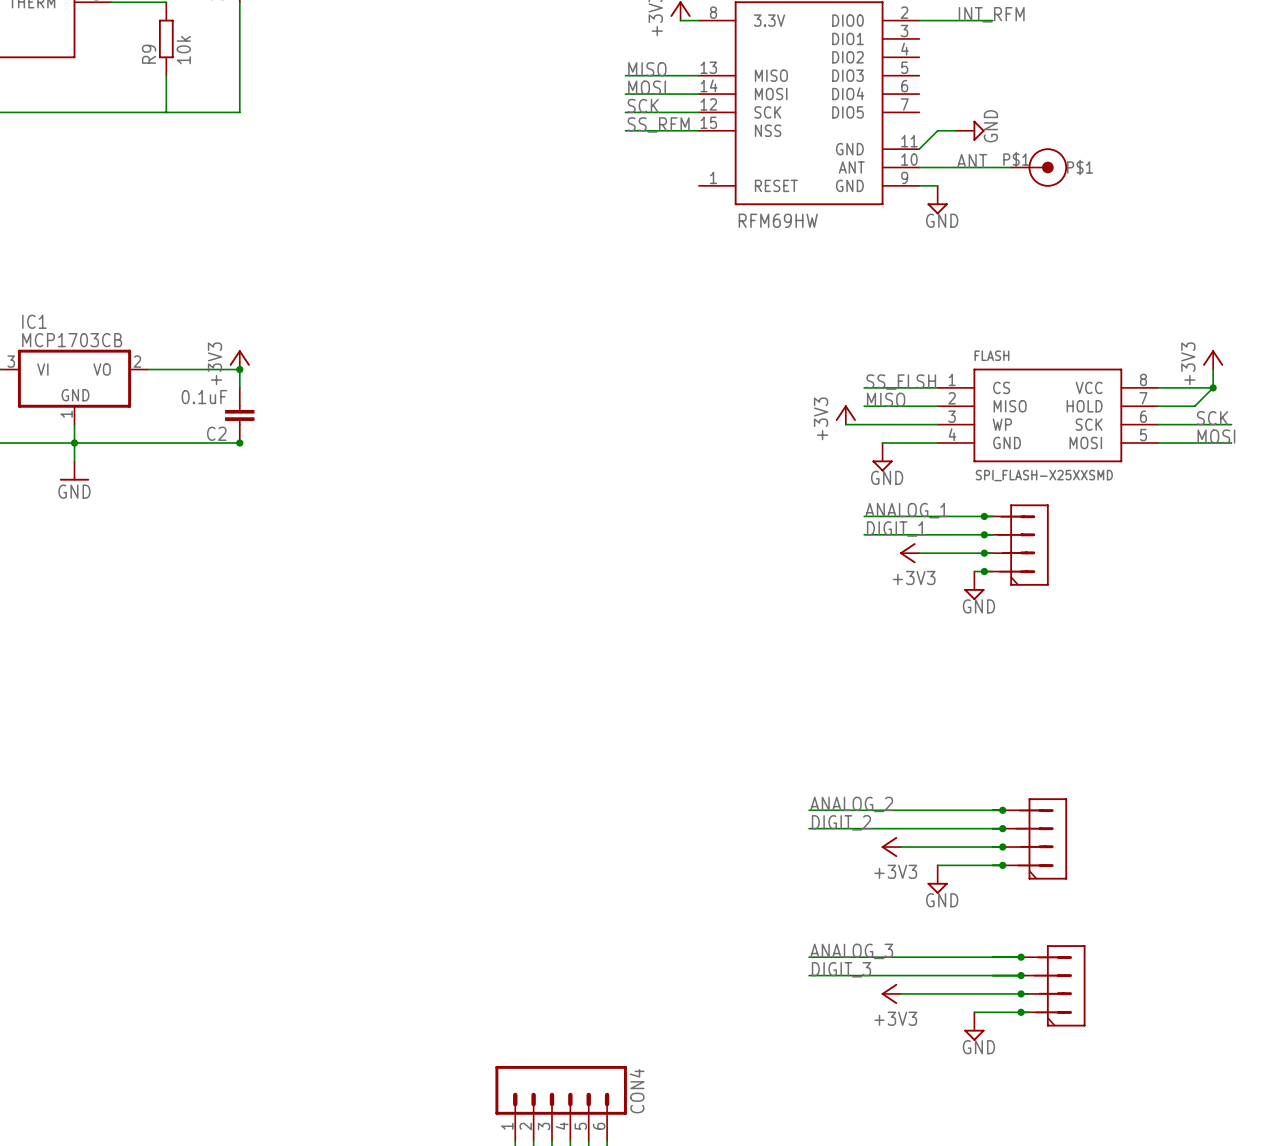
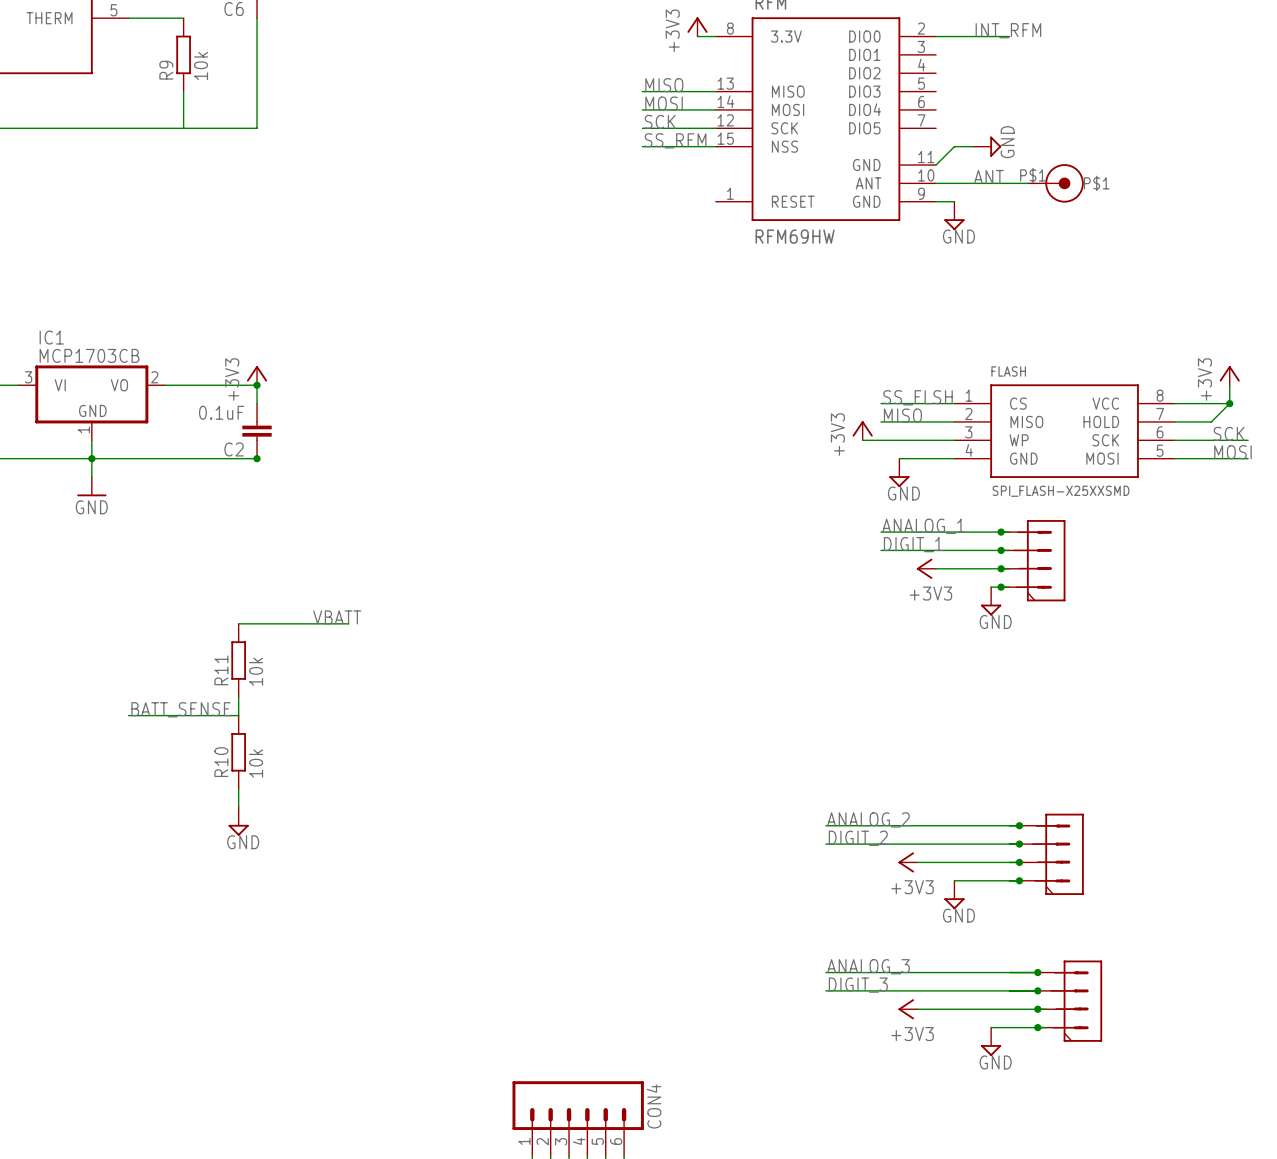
label: none -> VBATT (337, 617)
wire: none -> (238, 623) (348, 623)
R11: none -> 10k (238, 660)
wire: none -> (238, 697) (238, 715) (128, 715)
label: none -> BATT_SENSE (180, 709)
R10: none -> 10k (238, 752)
wire: none -> (238, 789) (238, 807)
power symbol: none -> GND (238, 821)

